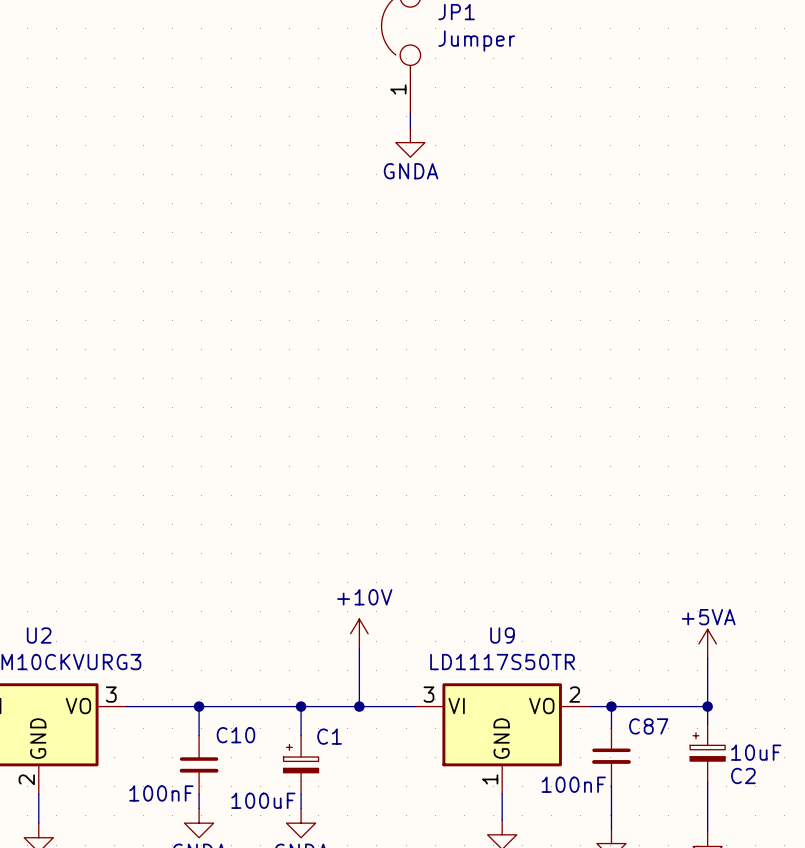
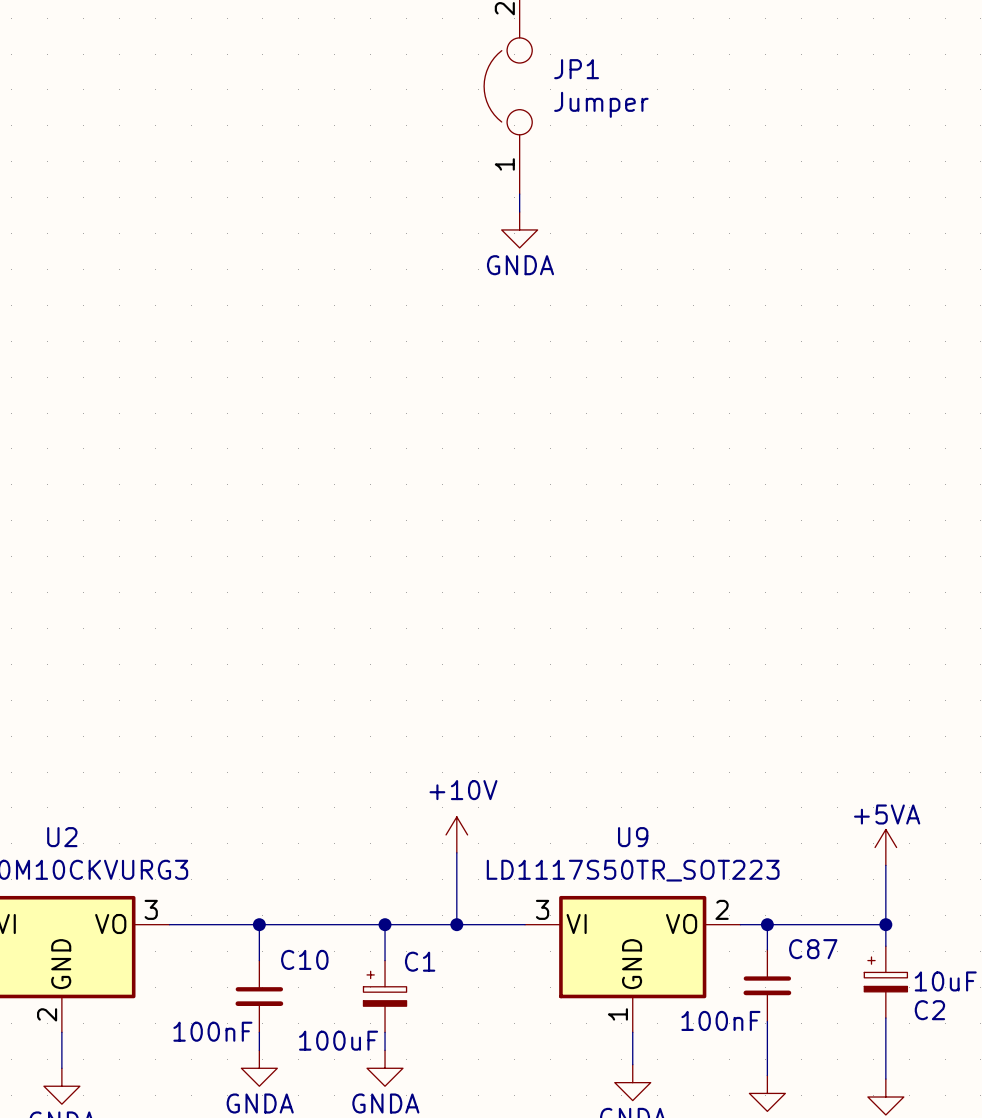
U9 value: LD1117S50TR (502, 662) -> LD1117S50TR_SOT223 (633, 870)

